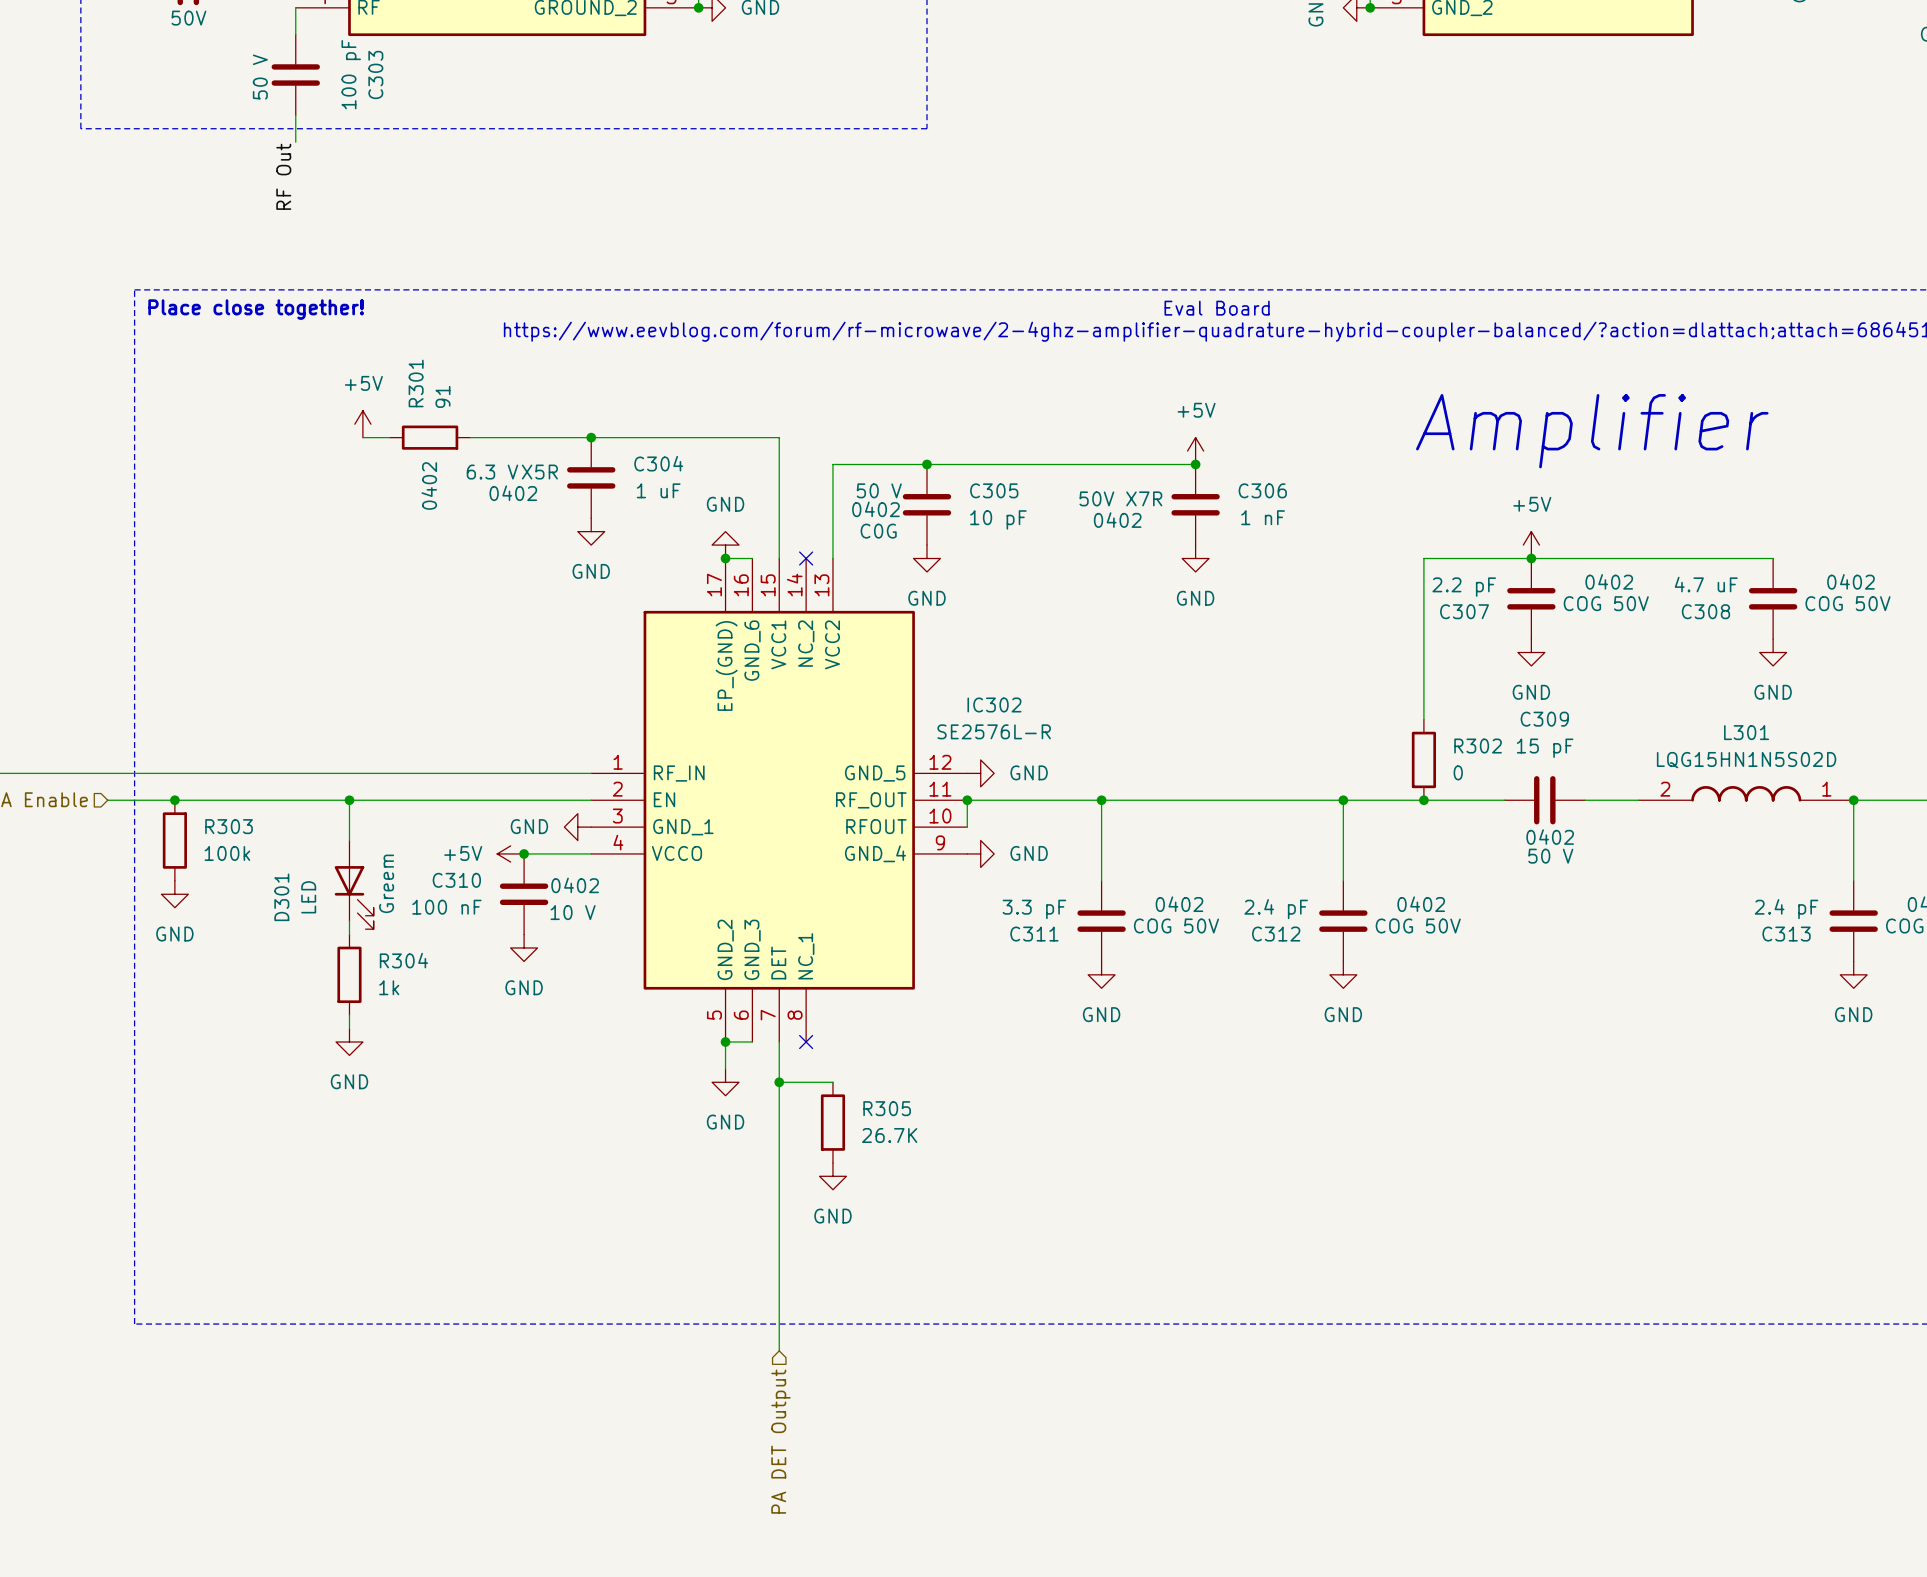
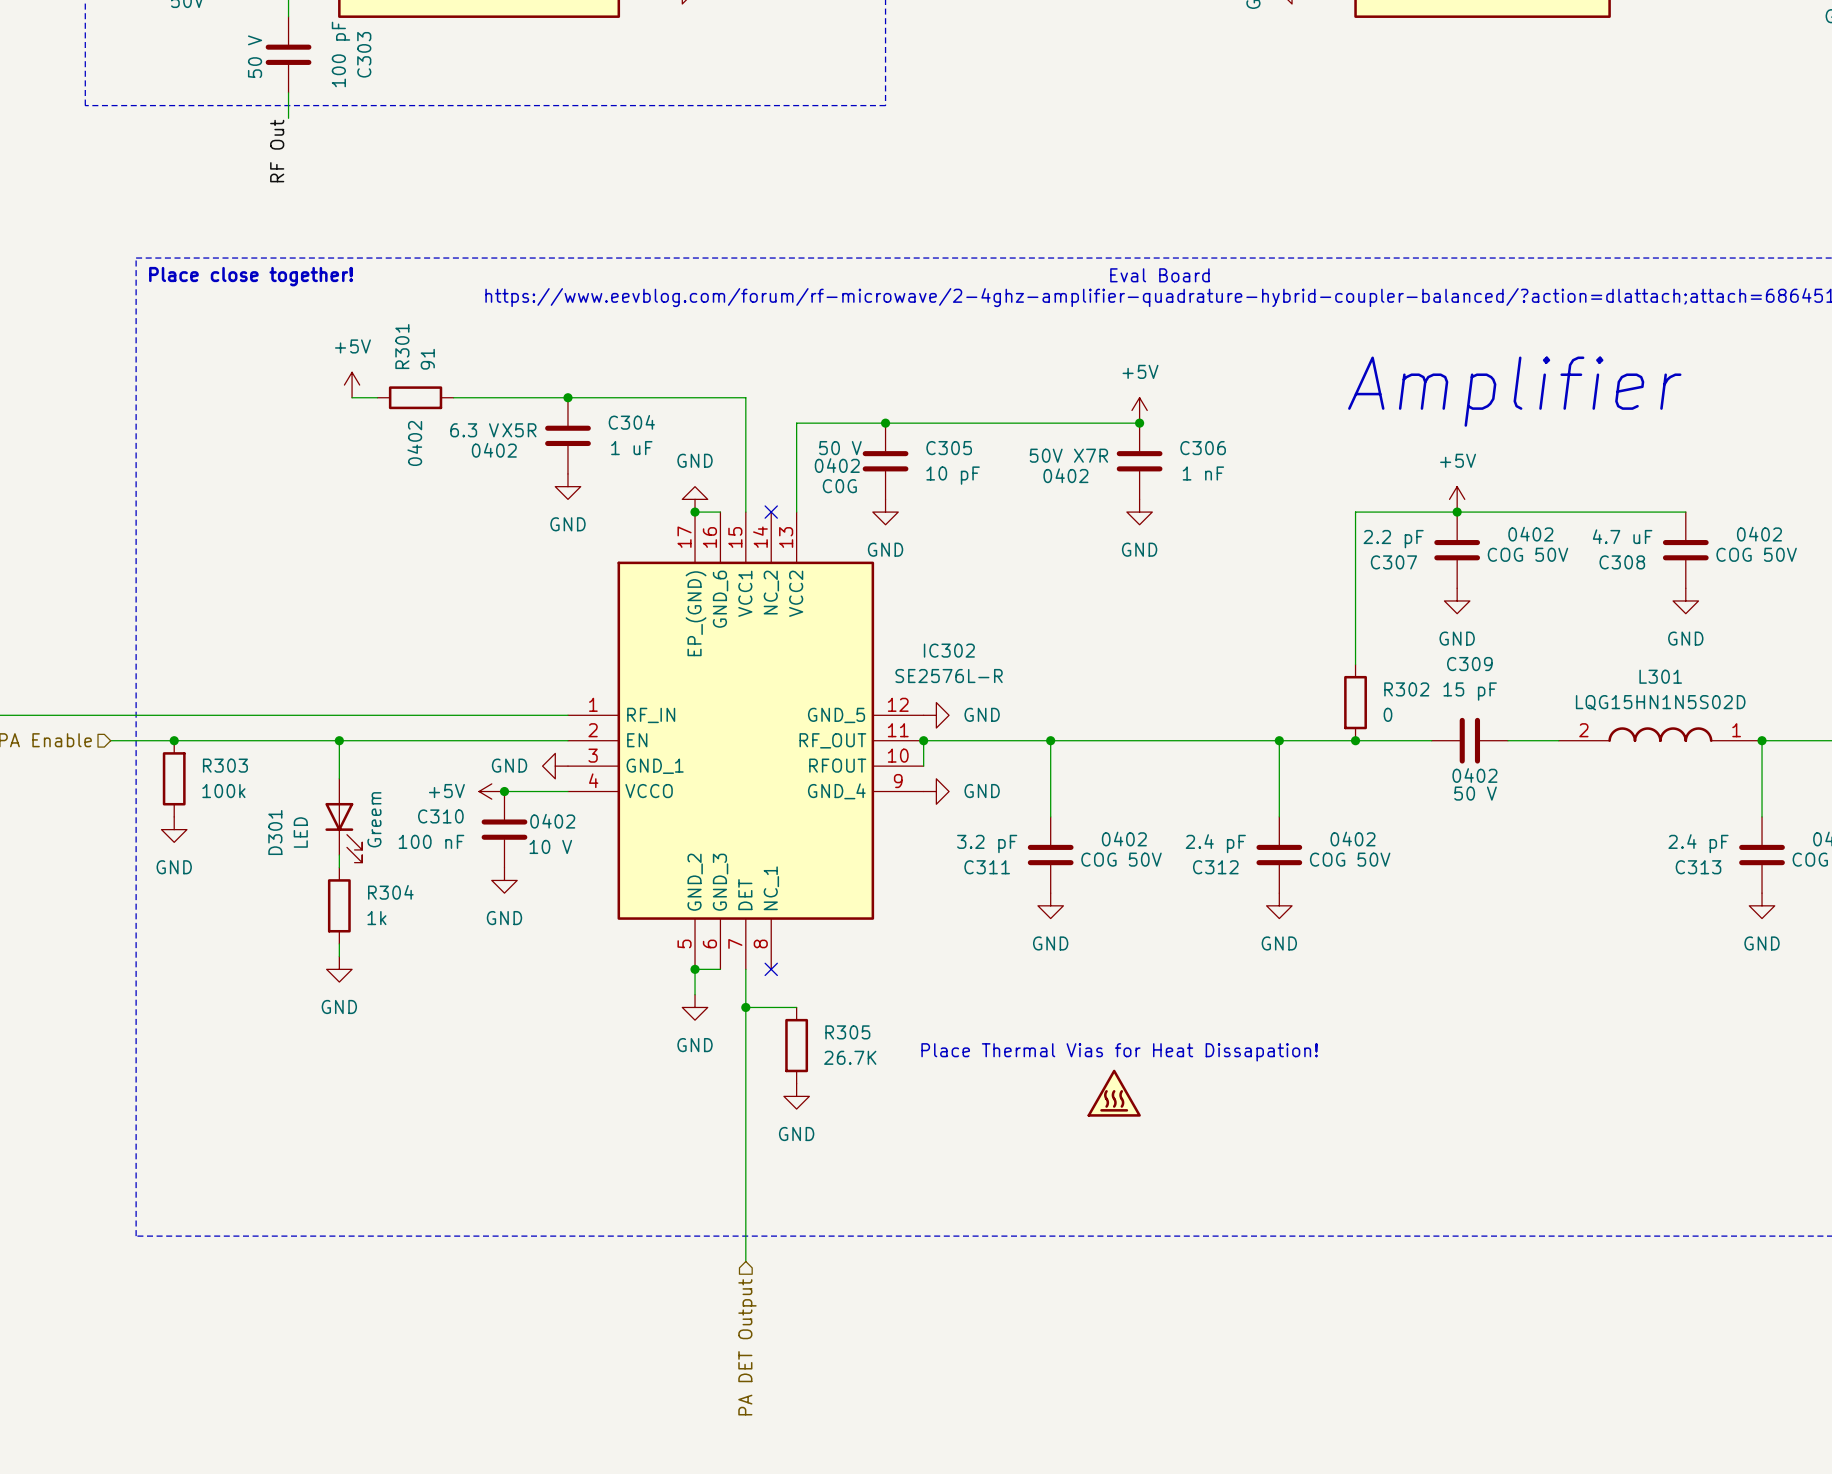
C311 value: 3.3 pF (1034, 909) -> 3.2 pF (987, 843)
text: none -> Place Thermal Vias for Heat Dissapation! (1119, 1052)
power symbol: none -> (1114, 1093)

